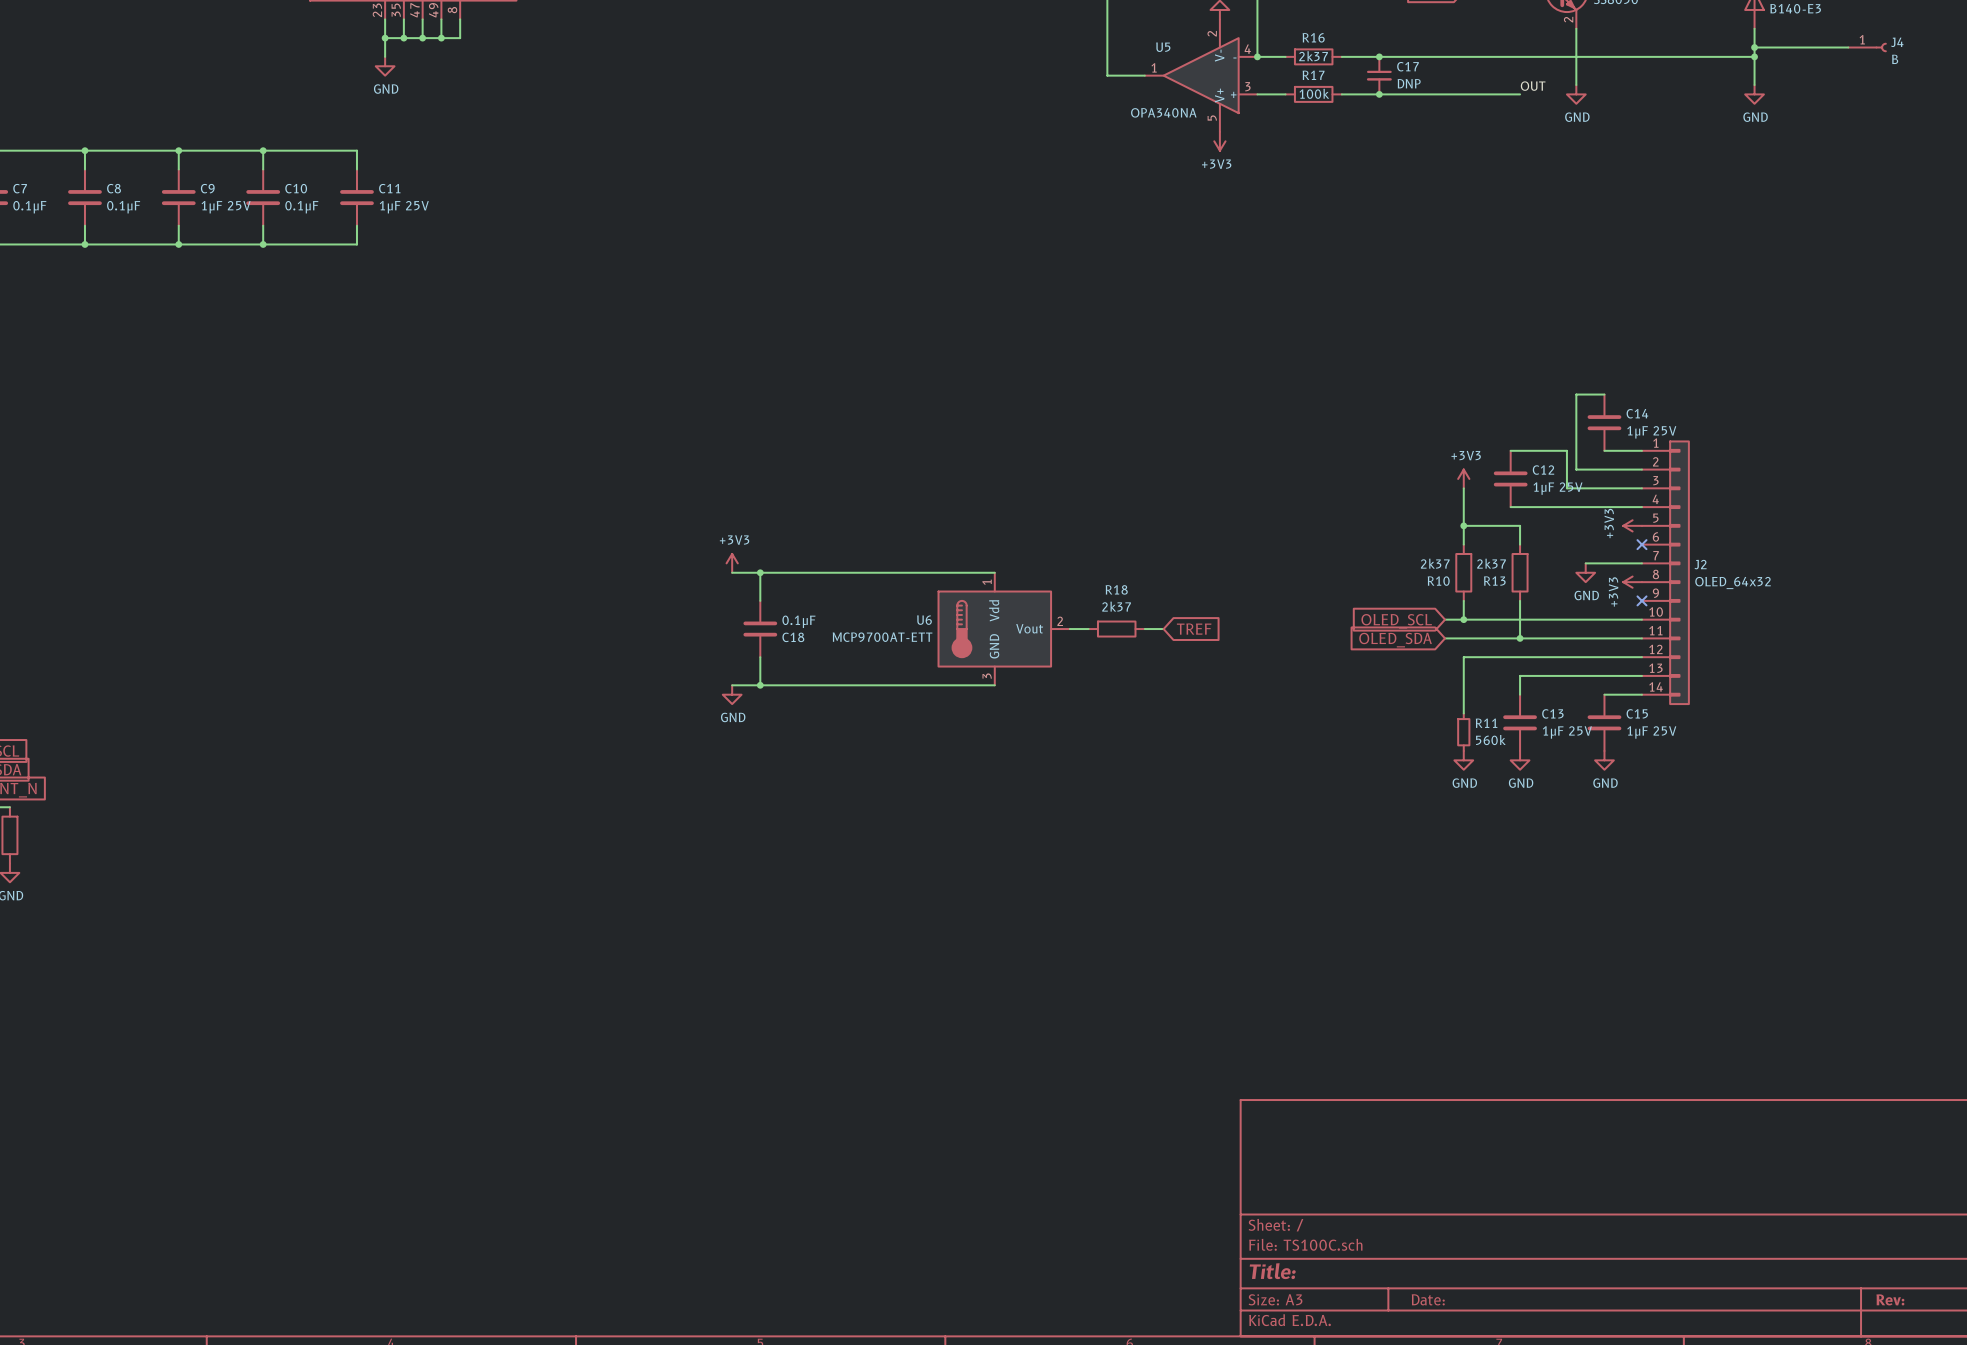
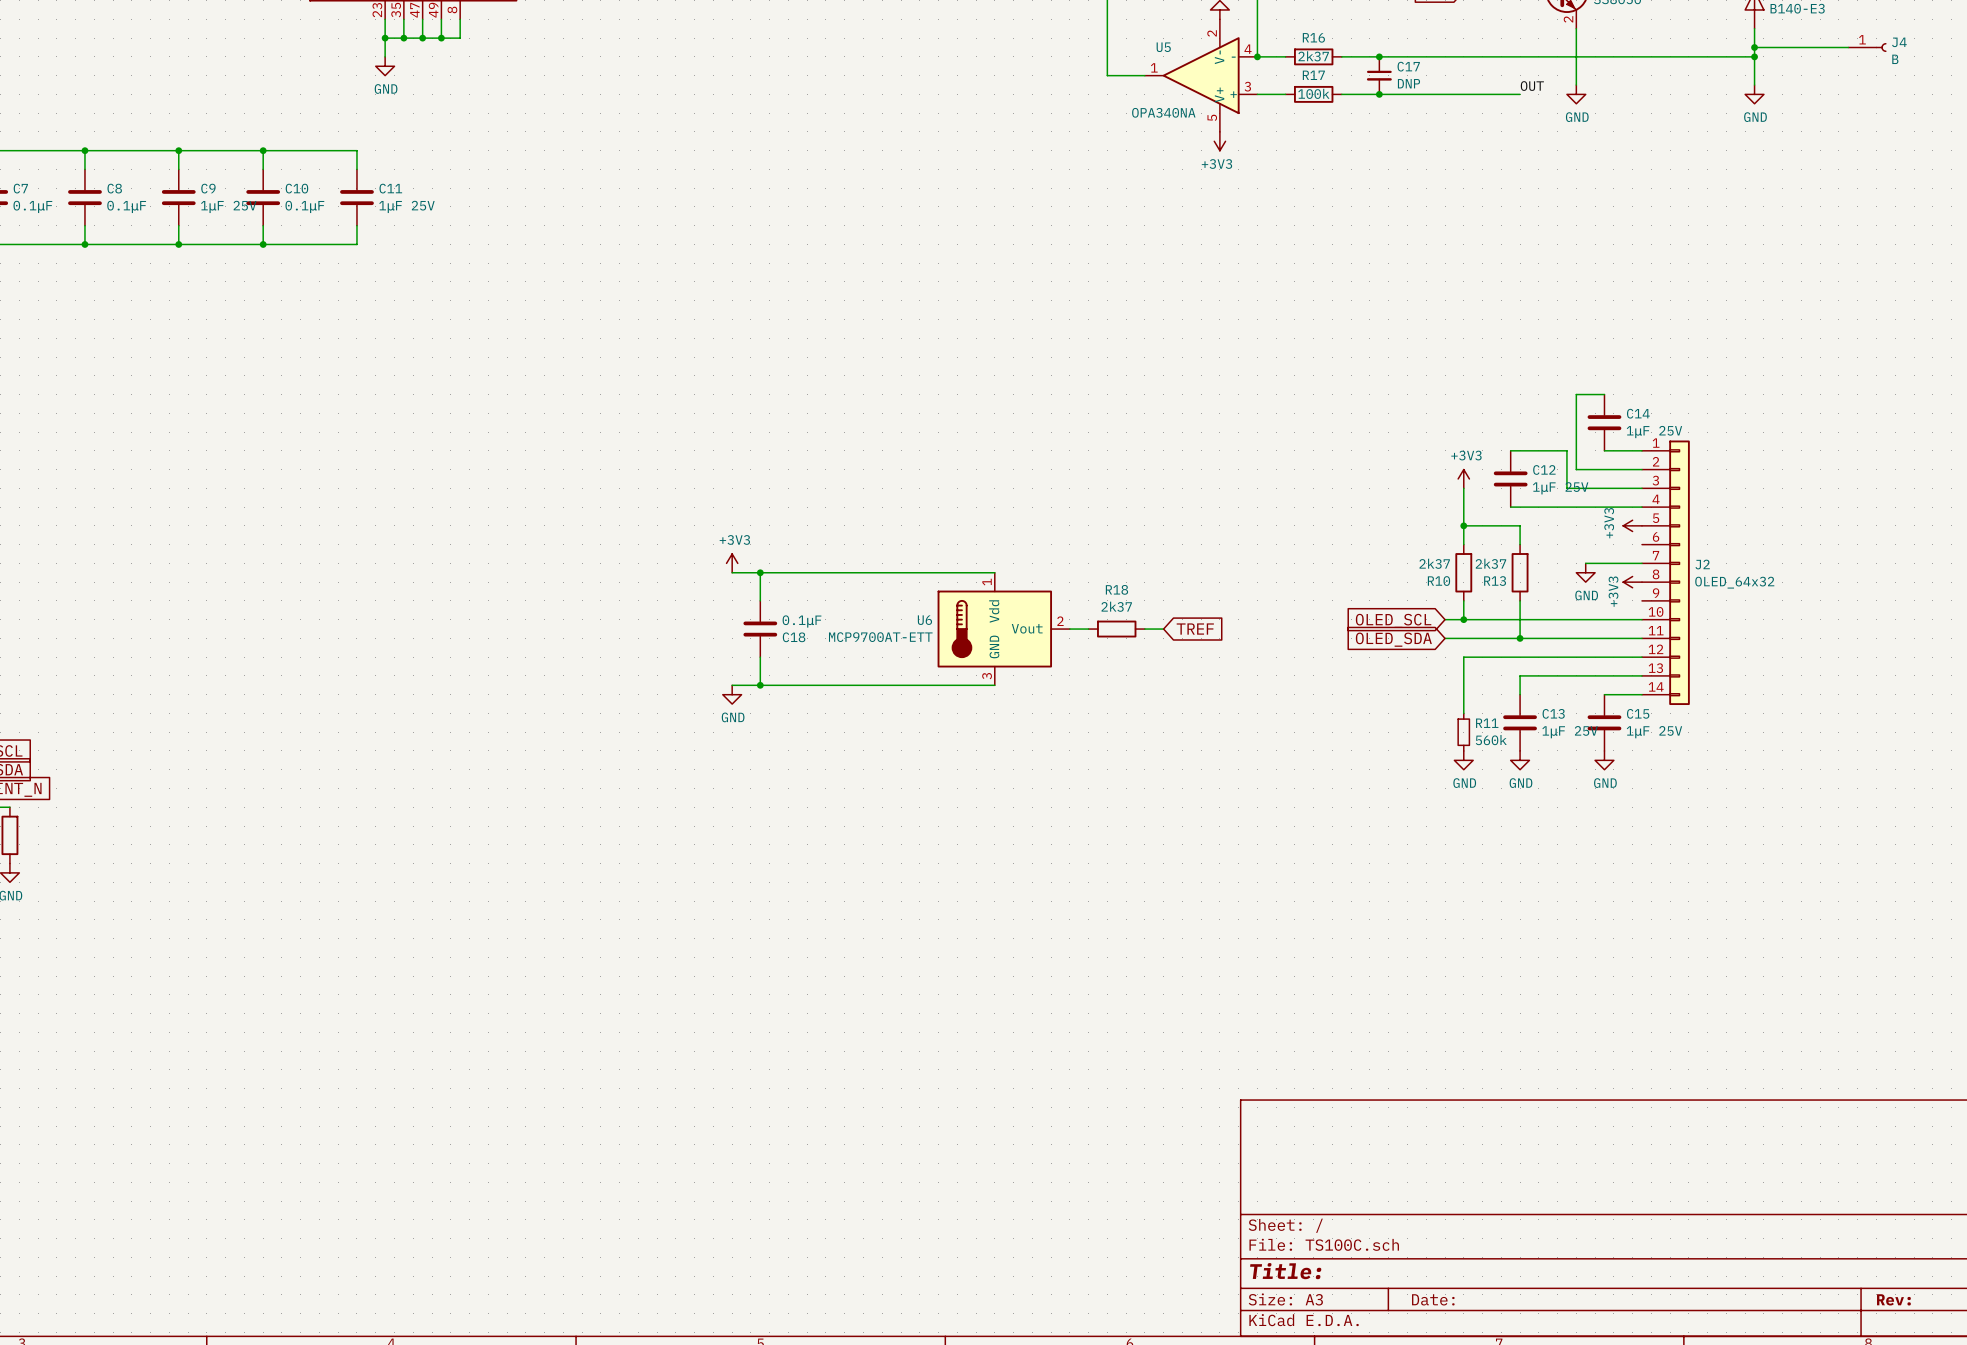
no-connect mark: (1641, 544) -> none
no-connect mark: (1641, 600) -> none

